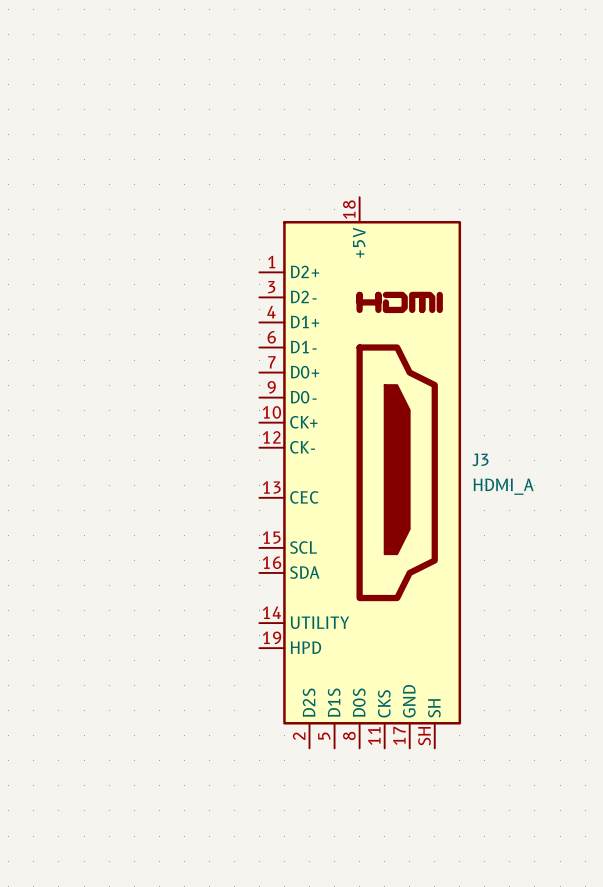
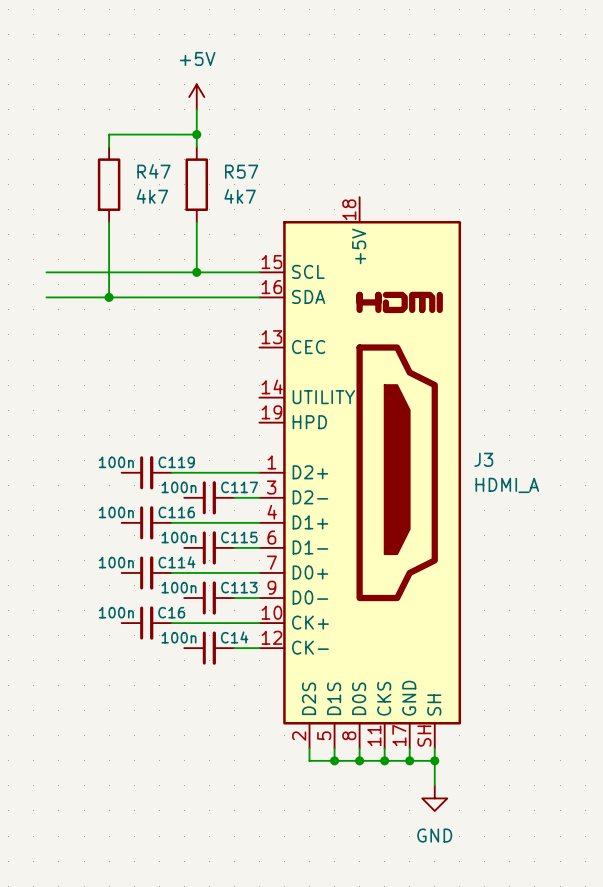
power symbol: none -> +5V (196, 97)
wire: none -> (196, 109) (196, 147)
wire: none -> (196, 134) (109, 134) (109, 147)
junction: none -> (196, 134)
R47: none -> 4k7 (109, 184)
R57: none -> 4k7 (196, 184)
J3 symbol: [259, 197, 462, 749] -> [259, 197, 462, 749]
wire: none -> (109, 222) (109, 297)
wire: none -> (196, 222) (196, 272)
wire: none -> (46, 272) (259, 272)
junction: none -> (196, 272)
wire: none -> (46, 297) (259, 297)
junction: none -> (109, 297)
C119: none -> 100n (146, 472)
wire: none -> (171, 472) (259, 472)
C117: none -> 100n (209, 497)
wire: none -> (234, 497) (259, 497)
C116: none -> 100n (146, 522)
wire: none -> (171, 522) (259, 522)
C115: none -> 100n (209, 547)
wire: none -> (234, 547) (259, 547)
C114: none -> 100n (146, 572)
wire: none -> (171, 572) (259, 572)
C113: none -> 100n (209, 598)
wire: none -> (234, 598) (259, 598)
C16: none -> 100n (146, 623)
wire: none -> (171, 623) (259, 623)
C14: none -> 100n (209, 648)
wire: none -> (234, 648) (259, 648)
wire: none -> (309, 748) (309, 760) (434, 760)
wire: none -> (334, 748) (334, 760)
wire: none -> (359, 748) (359, 760)
wire: none -> (384, 748) (384, 760)
wire: none -> (409, 748) (409, 760)
wire: none -> (434, 748) (434, 785)
junction: none -> (334, 760)
junction: none -> (359, 760)
junction: none -> (384, 760)
junction: none -> (409, 760)
junction: none -> (434, 760)
power symbol: none -> GND (434, 798)

